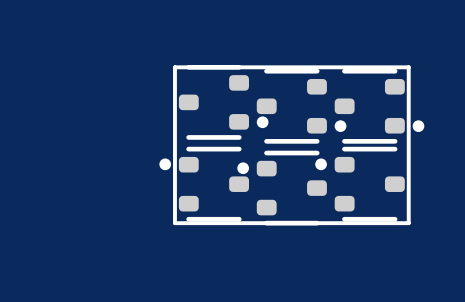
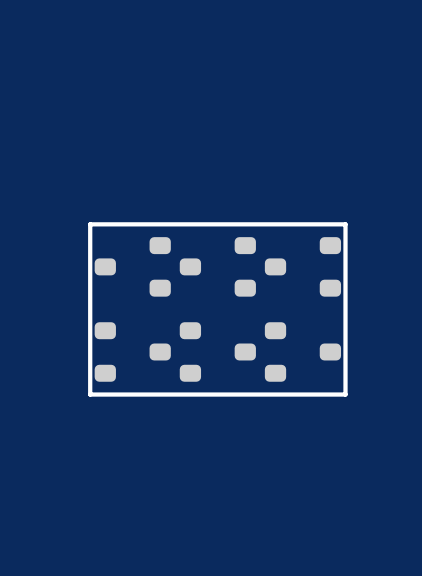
part footprint: [178, 64, 269, 140] -> [94, 237, 171, 297]
part footprint: [256, 68, 347, 144] -> [179, 237, 256, 297]
part footprint: [334, 68, 425, 144] -> [264, 237, 342, 297]
part footprint: [159, 146, 249, 222] -> [94, 322, 171, 382]
part footprint: [315, 146, 405, 222] -> [264, 322, 342, 382]
part footprint: [237, 150, 327, 226] -> [179, 322, 256, 382]

